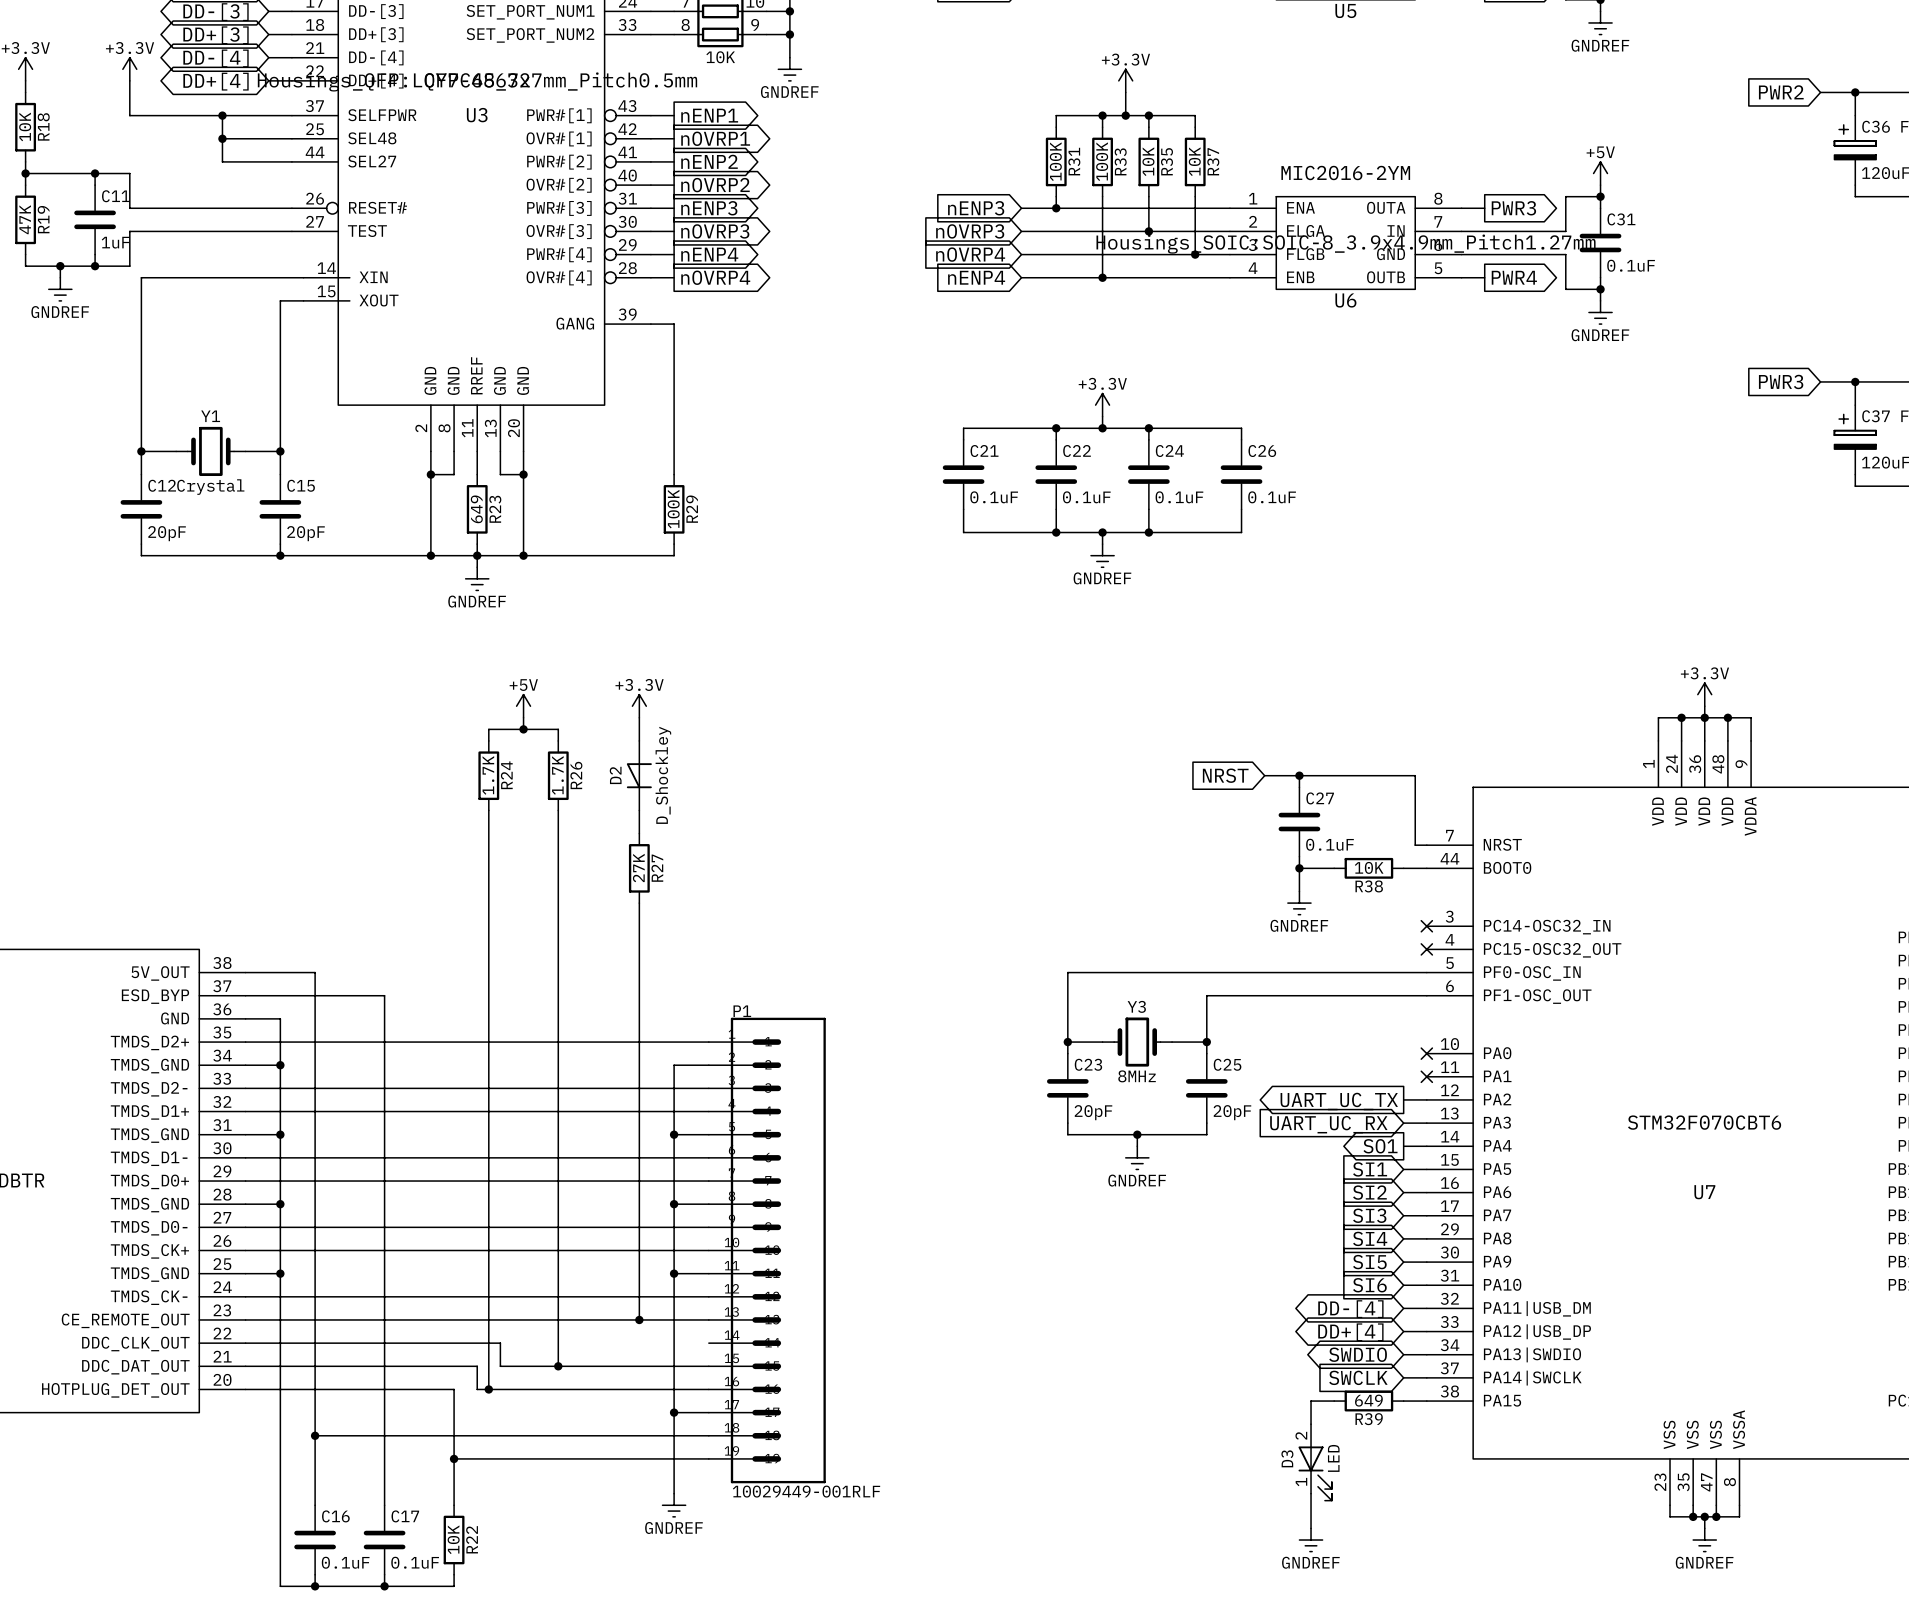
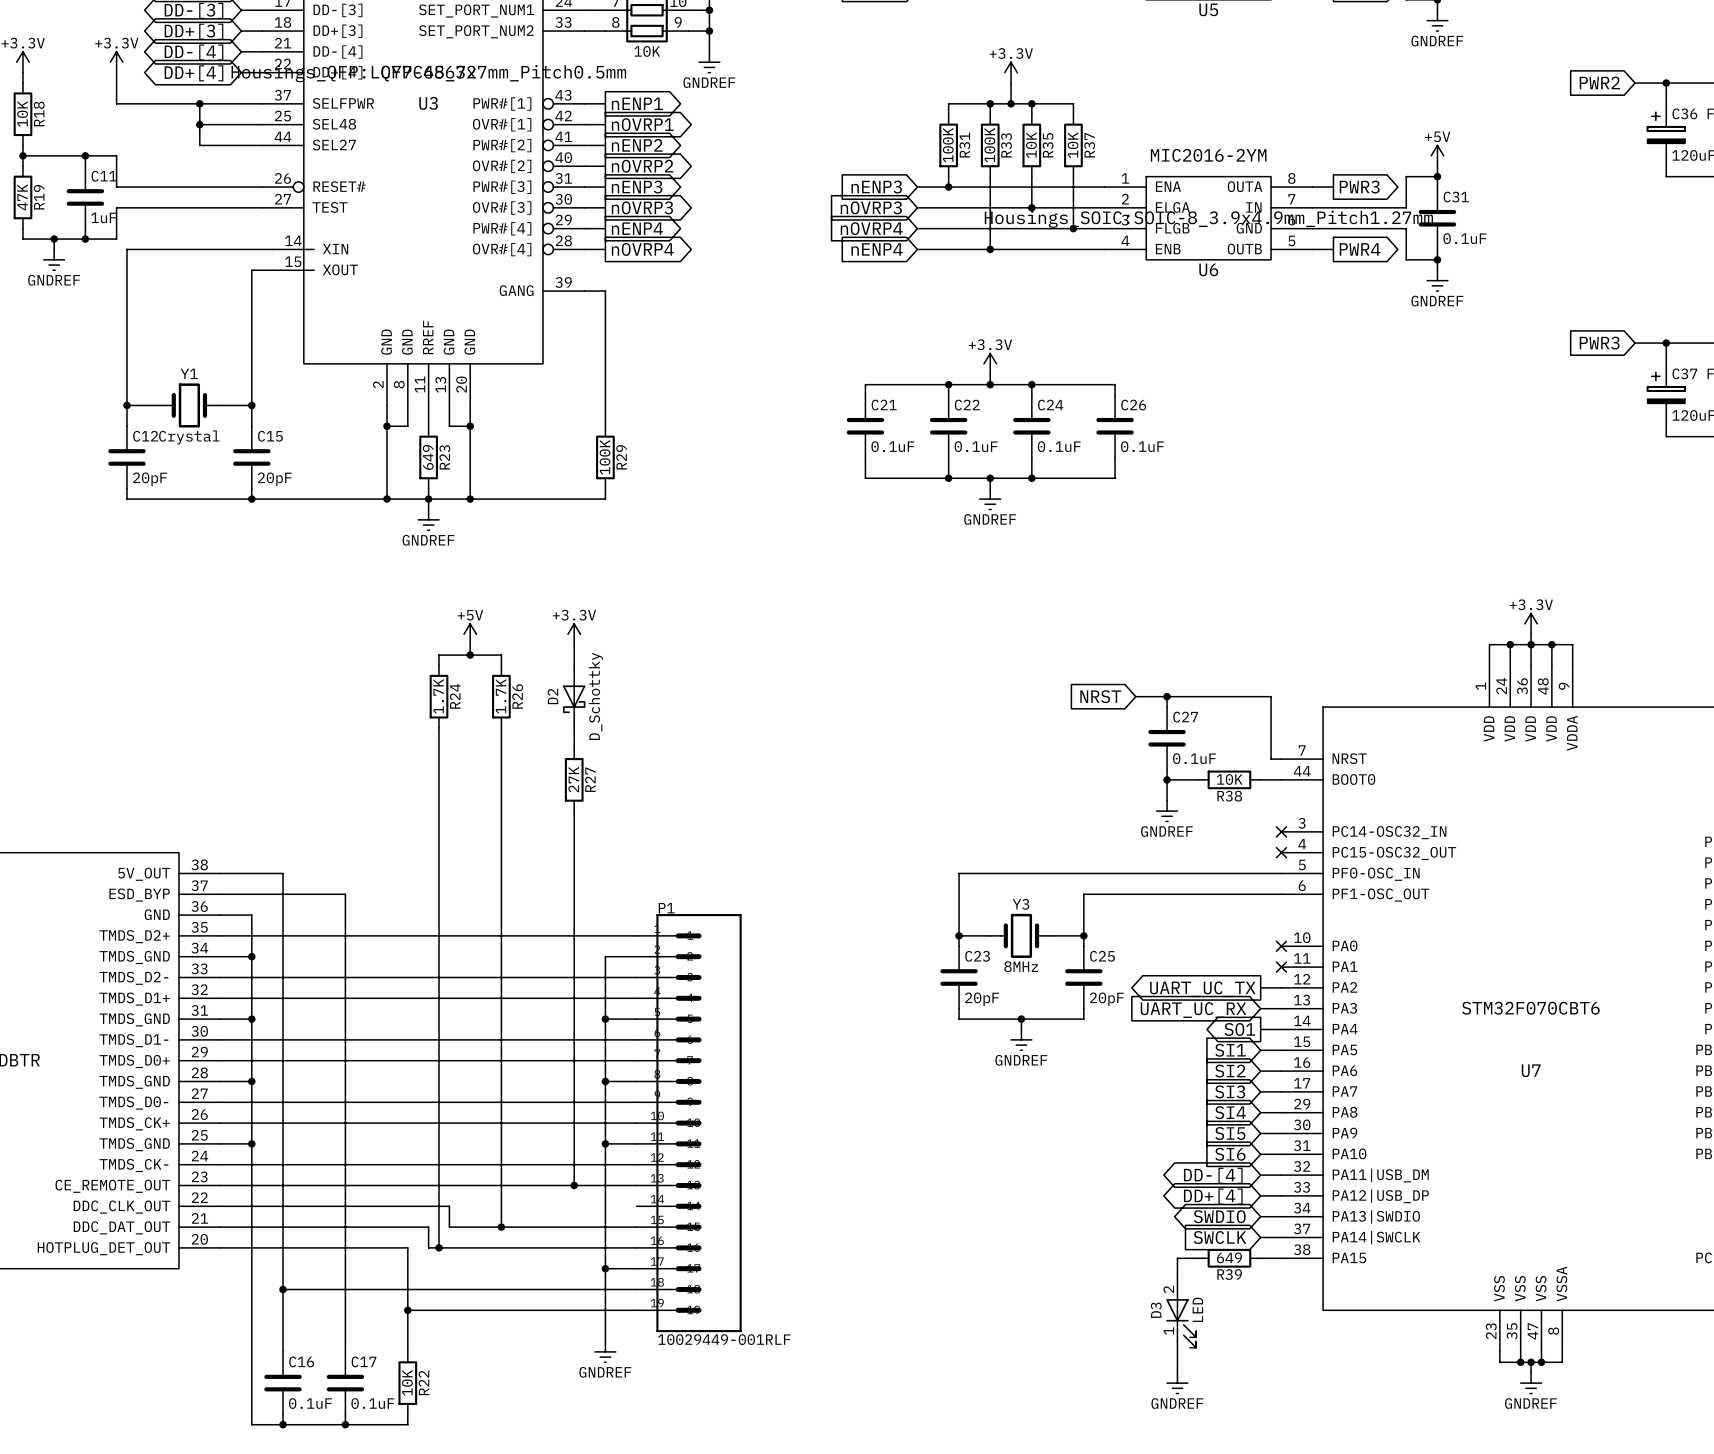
D2 symbol: [626, 740, 652, 811] -> [562, 665, 586, 728]
D2 value: D_Shockley (663, 775) -> D_Schottky (595, 696)

